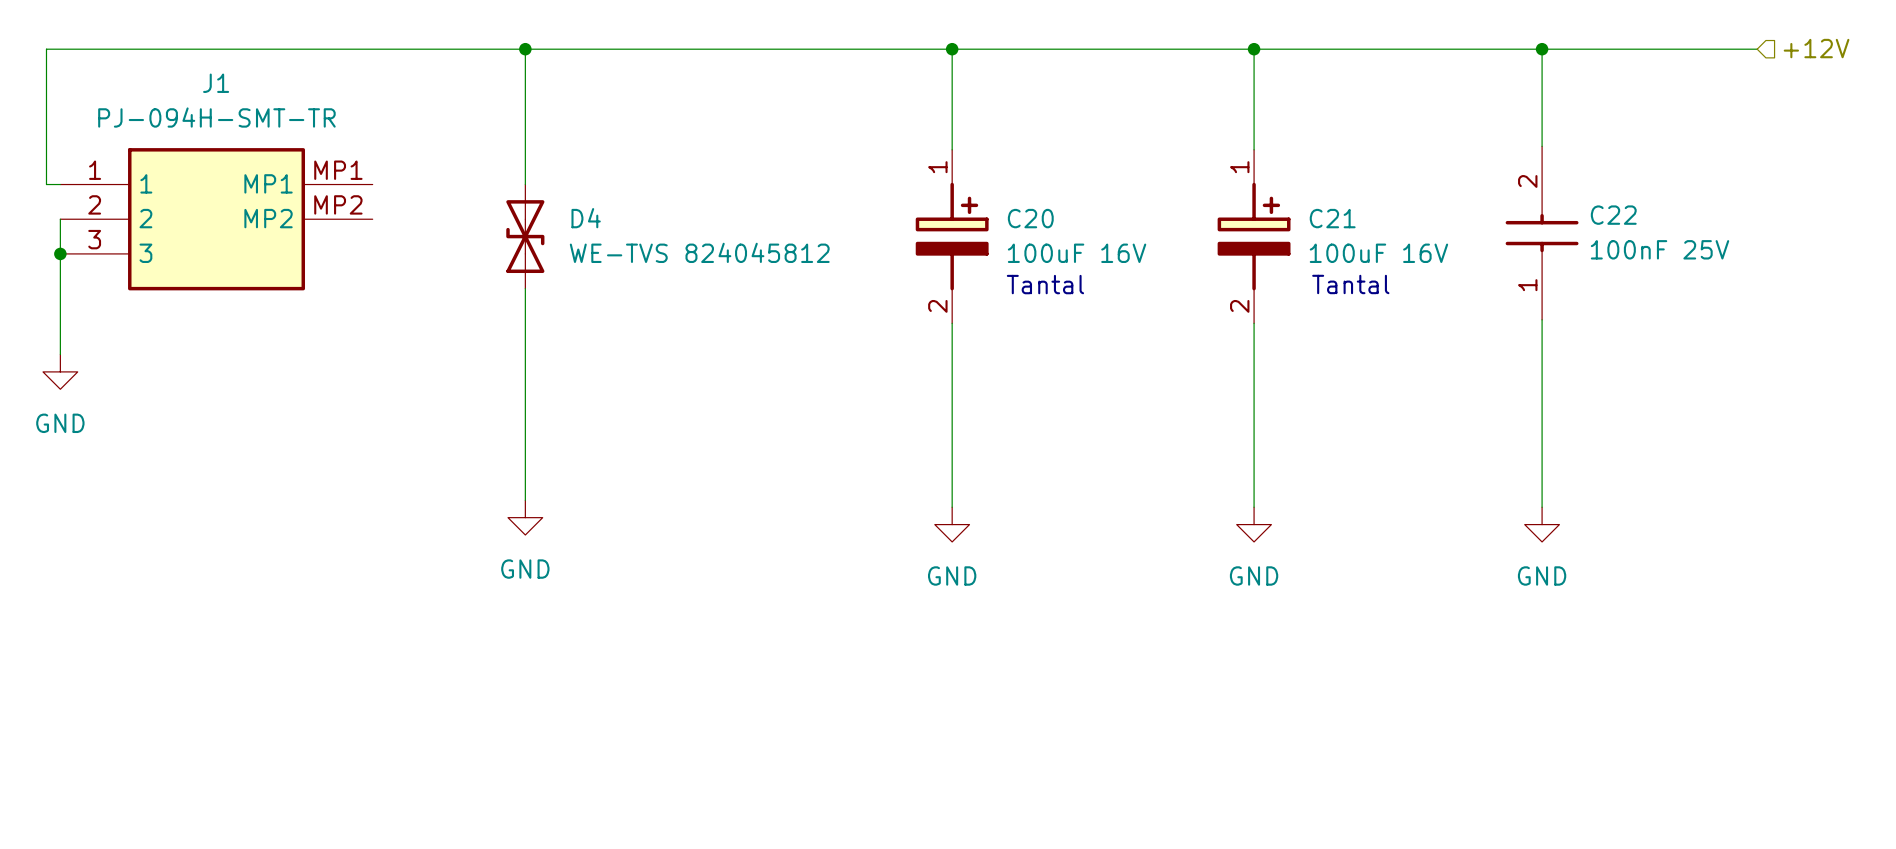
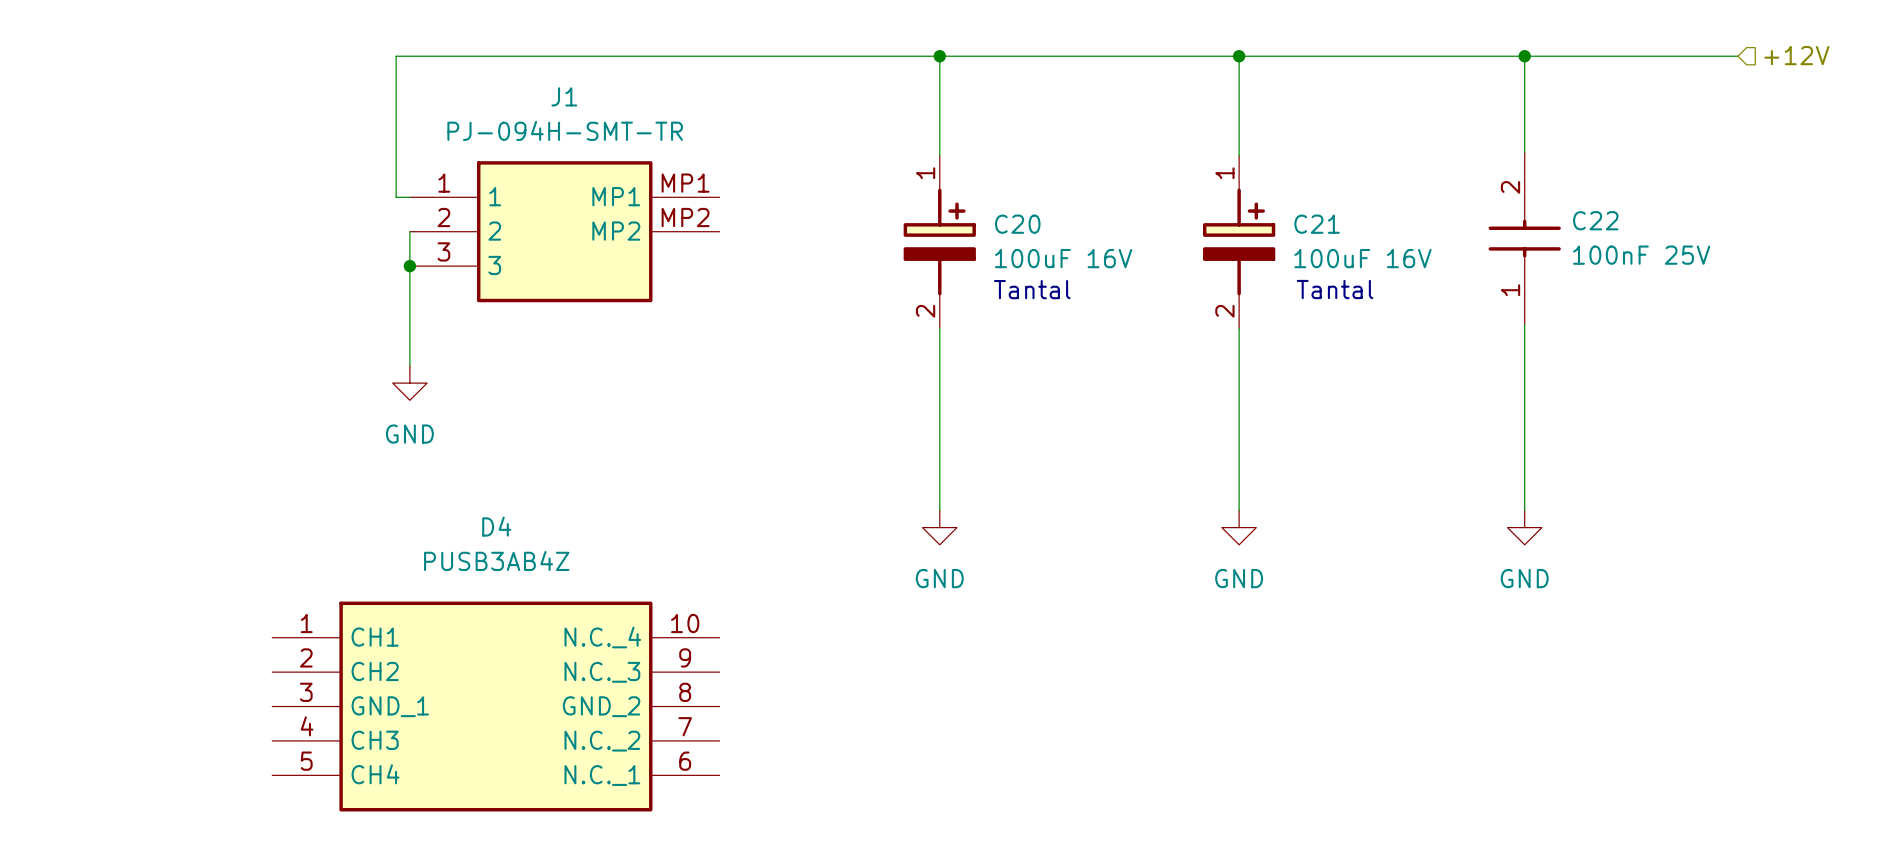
wire: (403, 49) (46, 49) (46, 184) (60, 184) -> (396, 56) (396, 197) (409, 197)
wire: (525, 49) (525, 184) -> (409, 231) (409, 365)
junction: (525, 49) -> none
D4 symbol: [506, 184, 545, 289] -> [272, 601, 720, 812]
D4 name position: D4 (586, 218) -> D4 (496, 526)
wire: (60, 219) (60, 354) -> none
J1 position: (216, 219) -> (564, 231)
D4 value: WE-TVS 824045812 (699, 252) -> PUSB3AB4Z (496, 560)
junction: (60, 253) -> none
junction: none -> (409, 266)
wire: (525, 288) (525, 500) -> none
power symbol: GND (60, 371) -> none
power symbol position: GND (525, 517) -> GND (409, 383)

